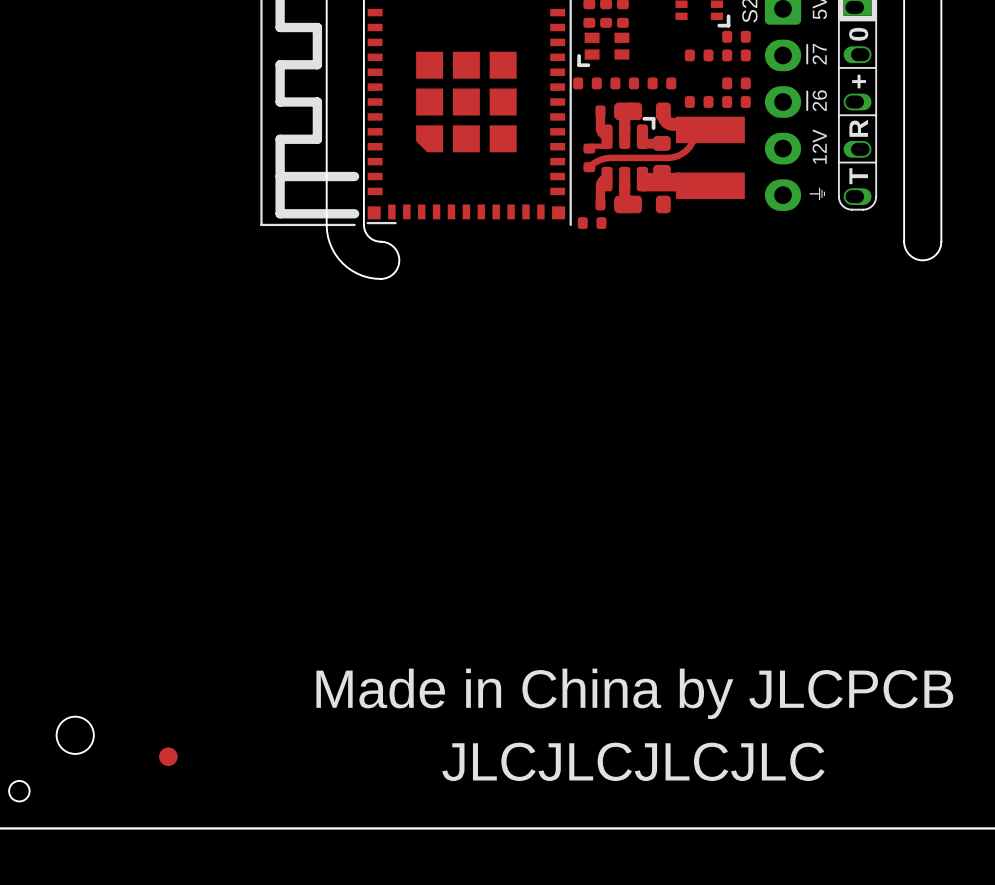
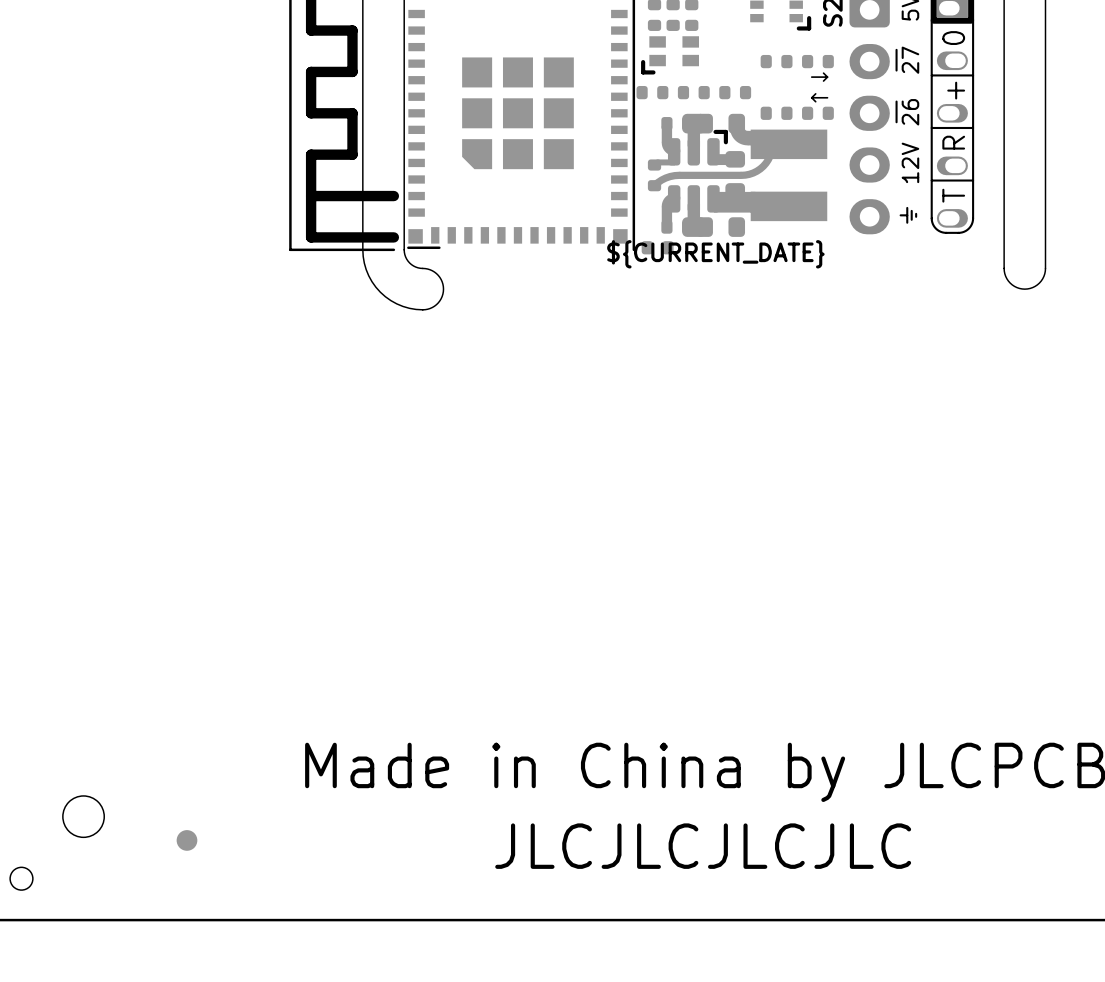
part: (736, 36) -> none
text: none -> ↓ (819, 77)
part: (736, 83) -> none
text: none -> ↑ (819, 97)
text: none -> ${CURRENT_DATE} (715, 254)

